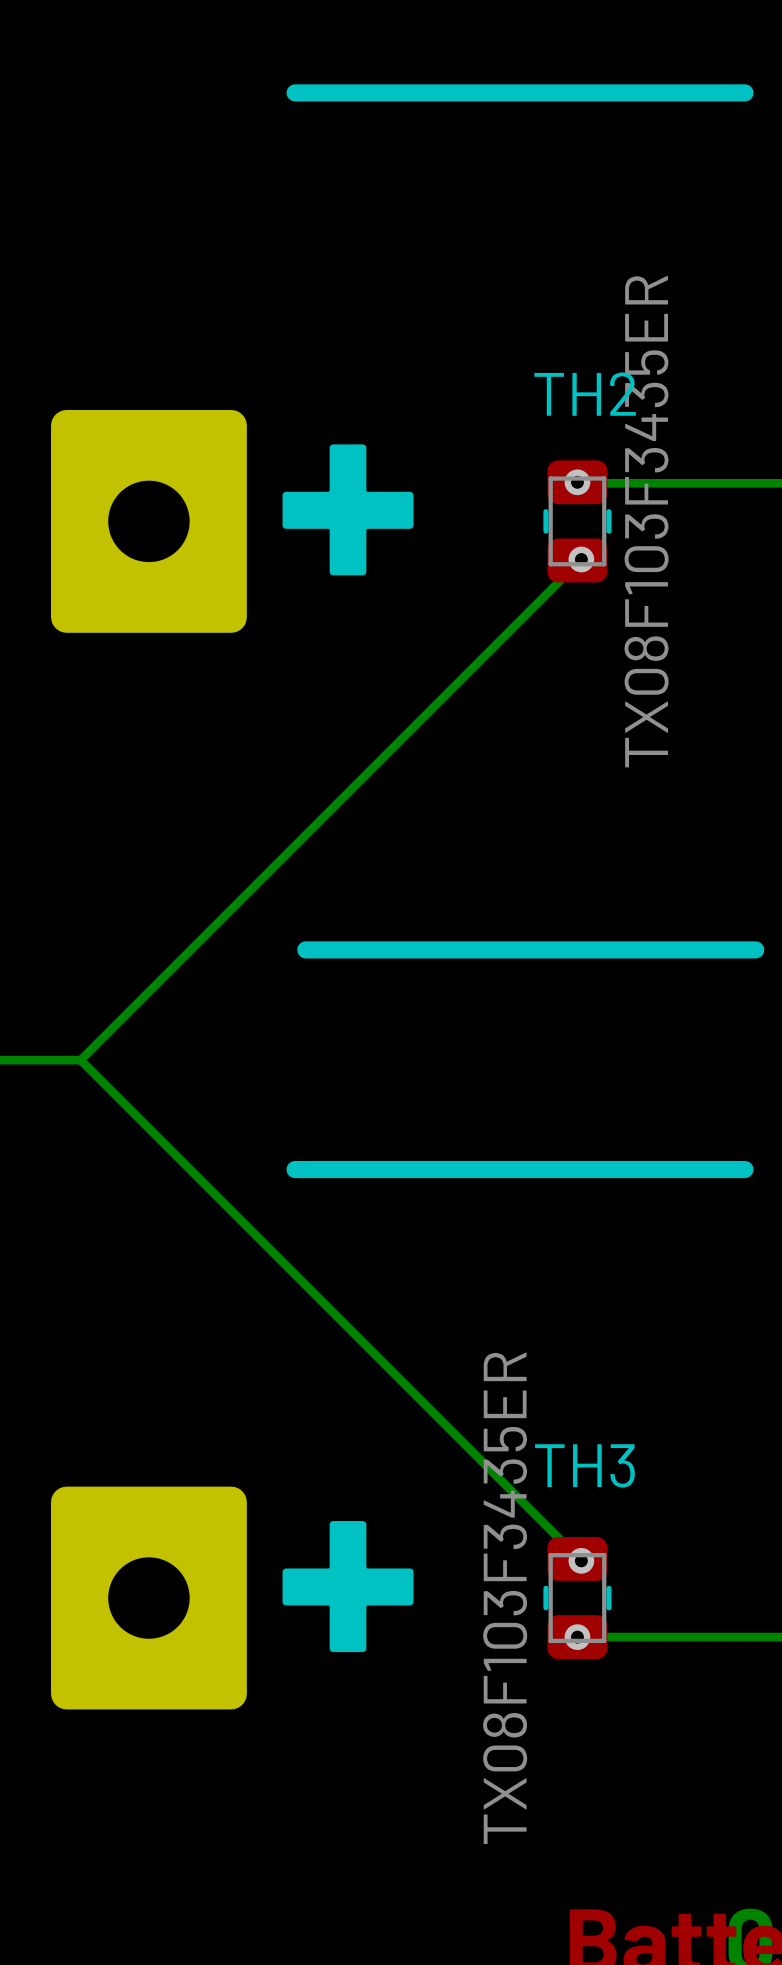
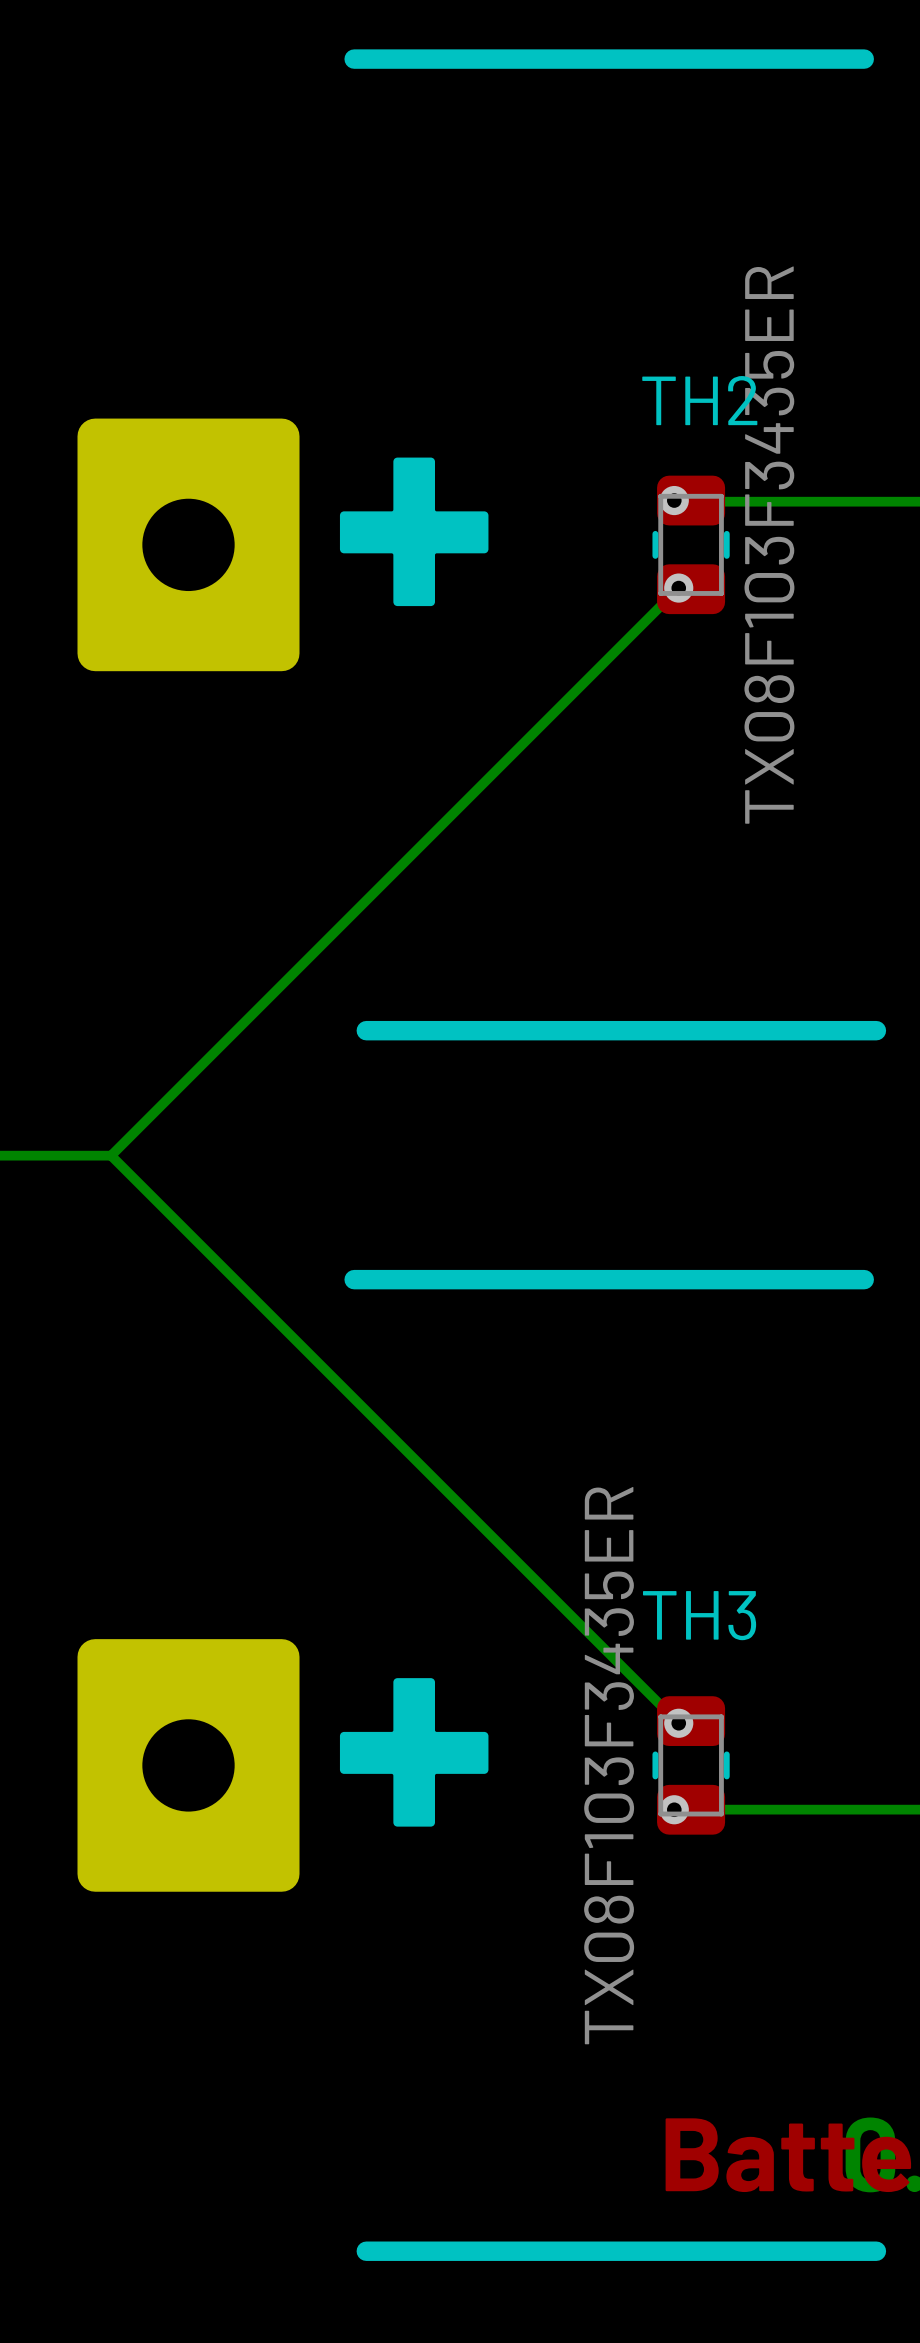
TH2 position: (577, 521) -> (691, 544)
TH3 position: (577, 1598) -> (691, 1765)

